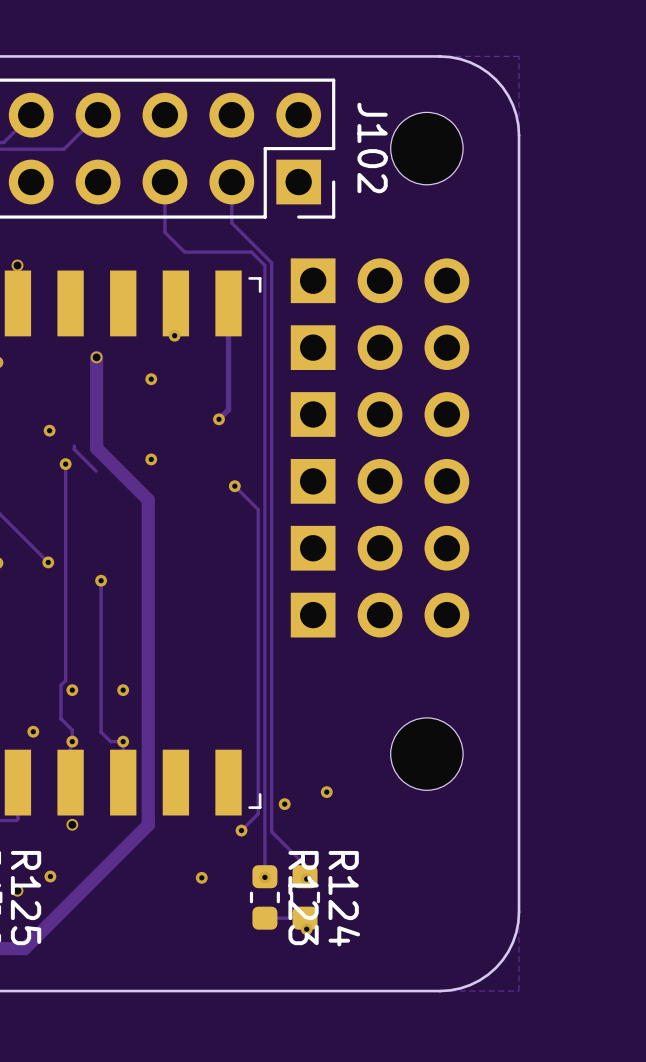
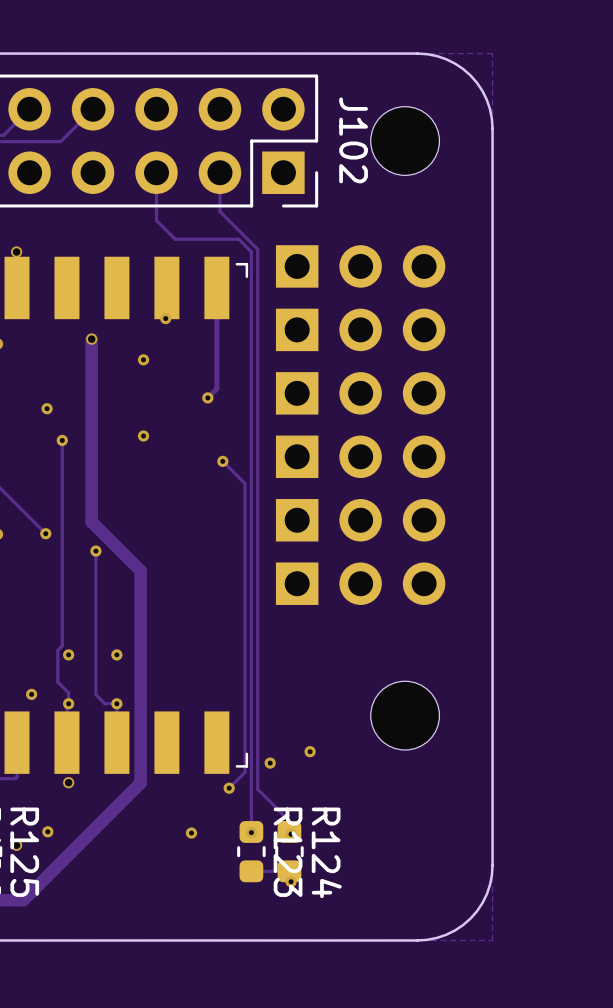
track: (74, 446) (74, 449) (96, 471) -> none
track: (96, 448) (148, 499) (148, 601) -> (91, 425) (91, 521) (140, 570)

